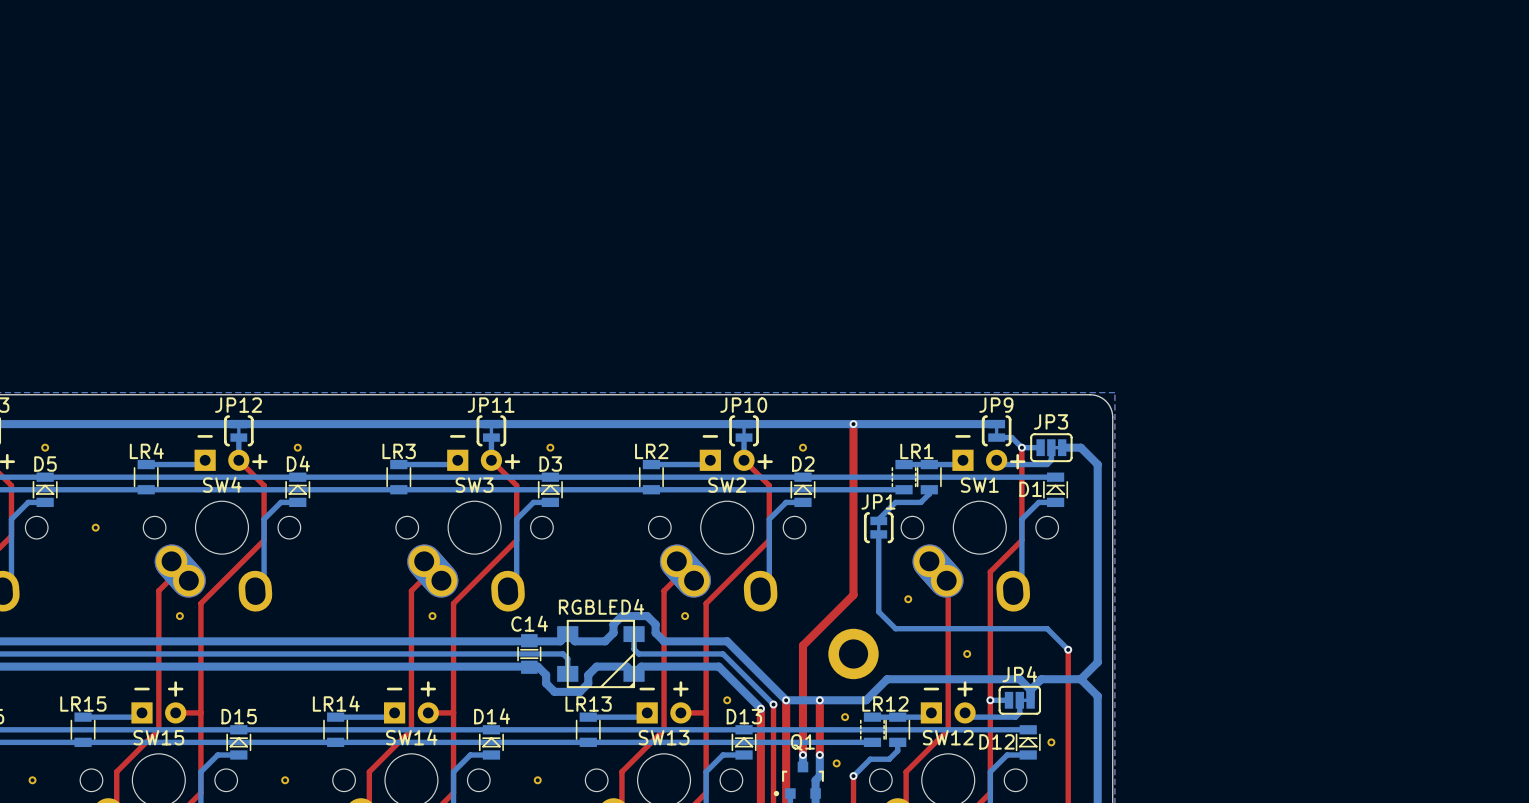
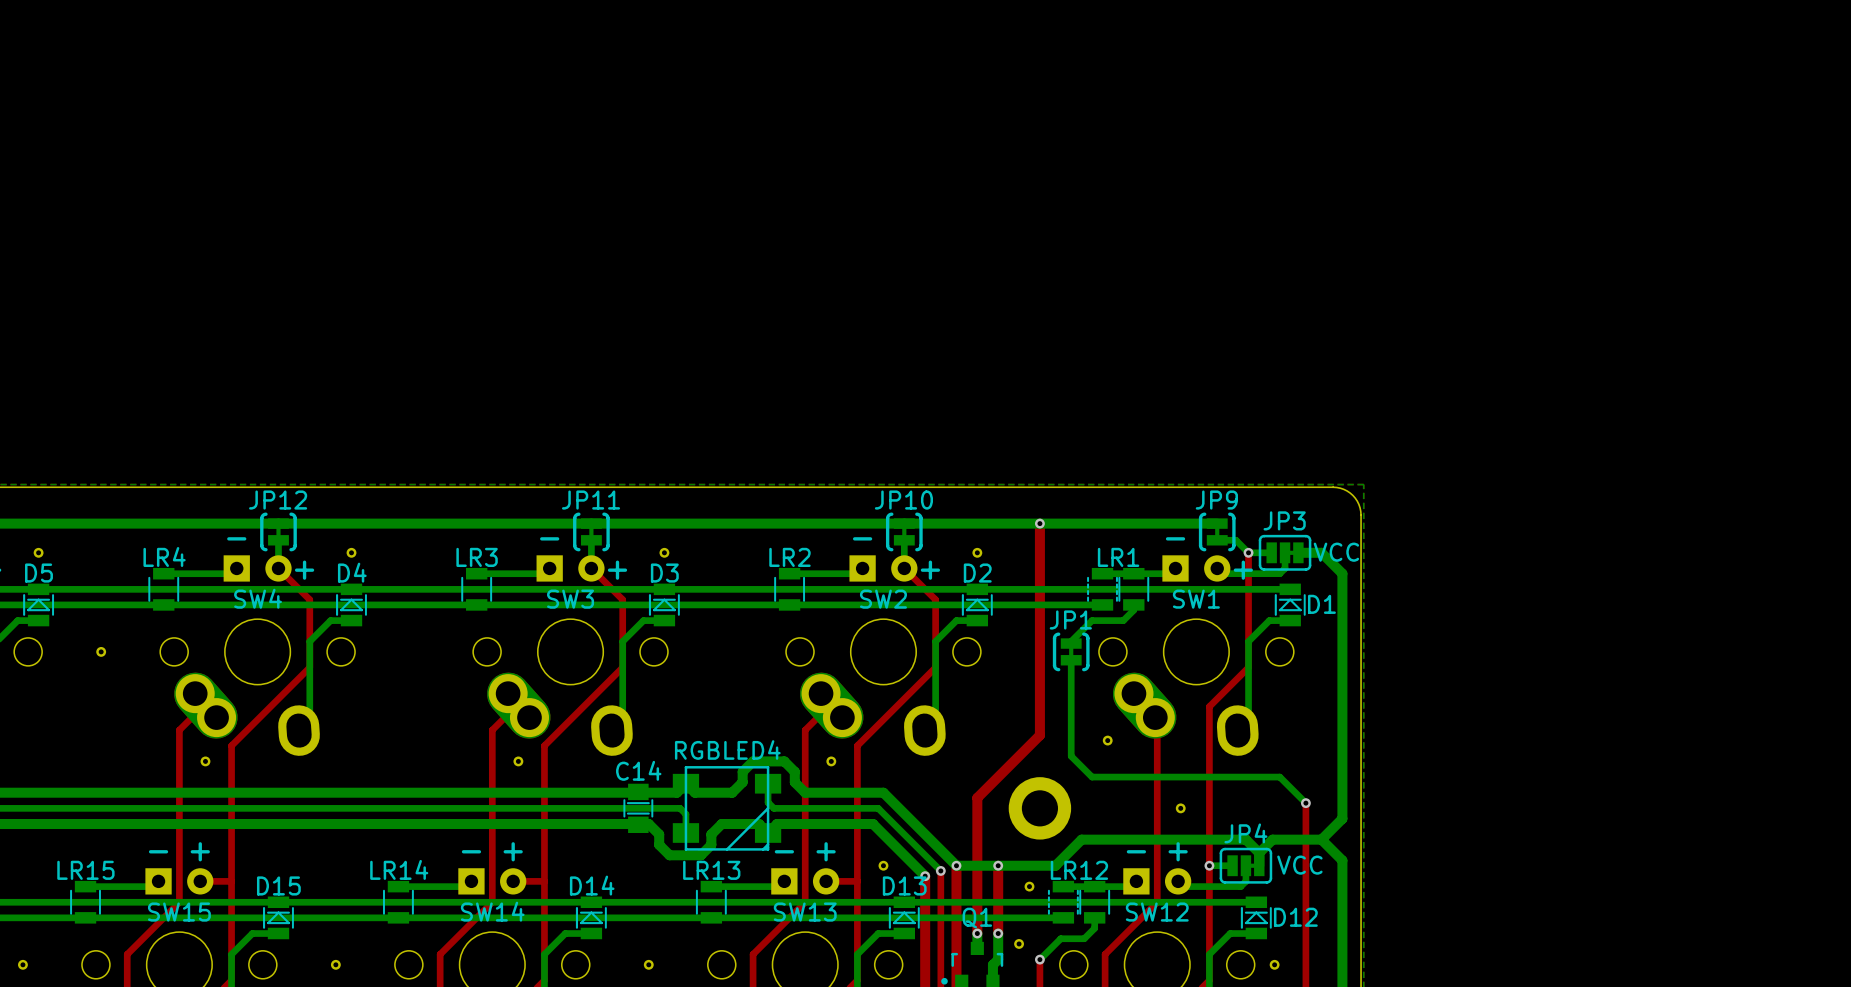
text: none -> VCC (1336, 552)
D1 name position: D1 (1030, 489) -> D1 (1321, 604)
text: none -> VCC (1299, 865)
D12 name position: D12 (996, 741) -> D12 (1295, 917)
part position: (1051, 742) -> (1274, 964)

